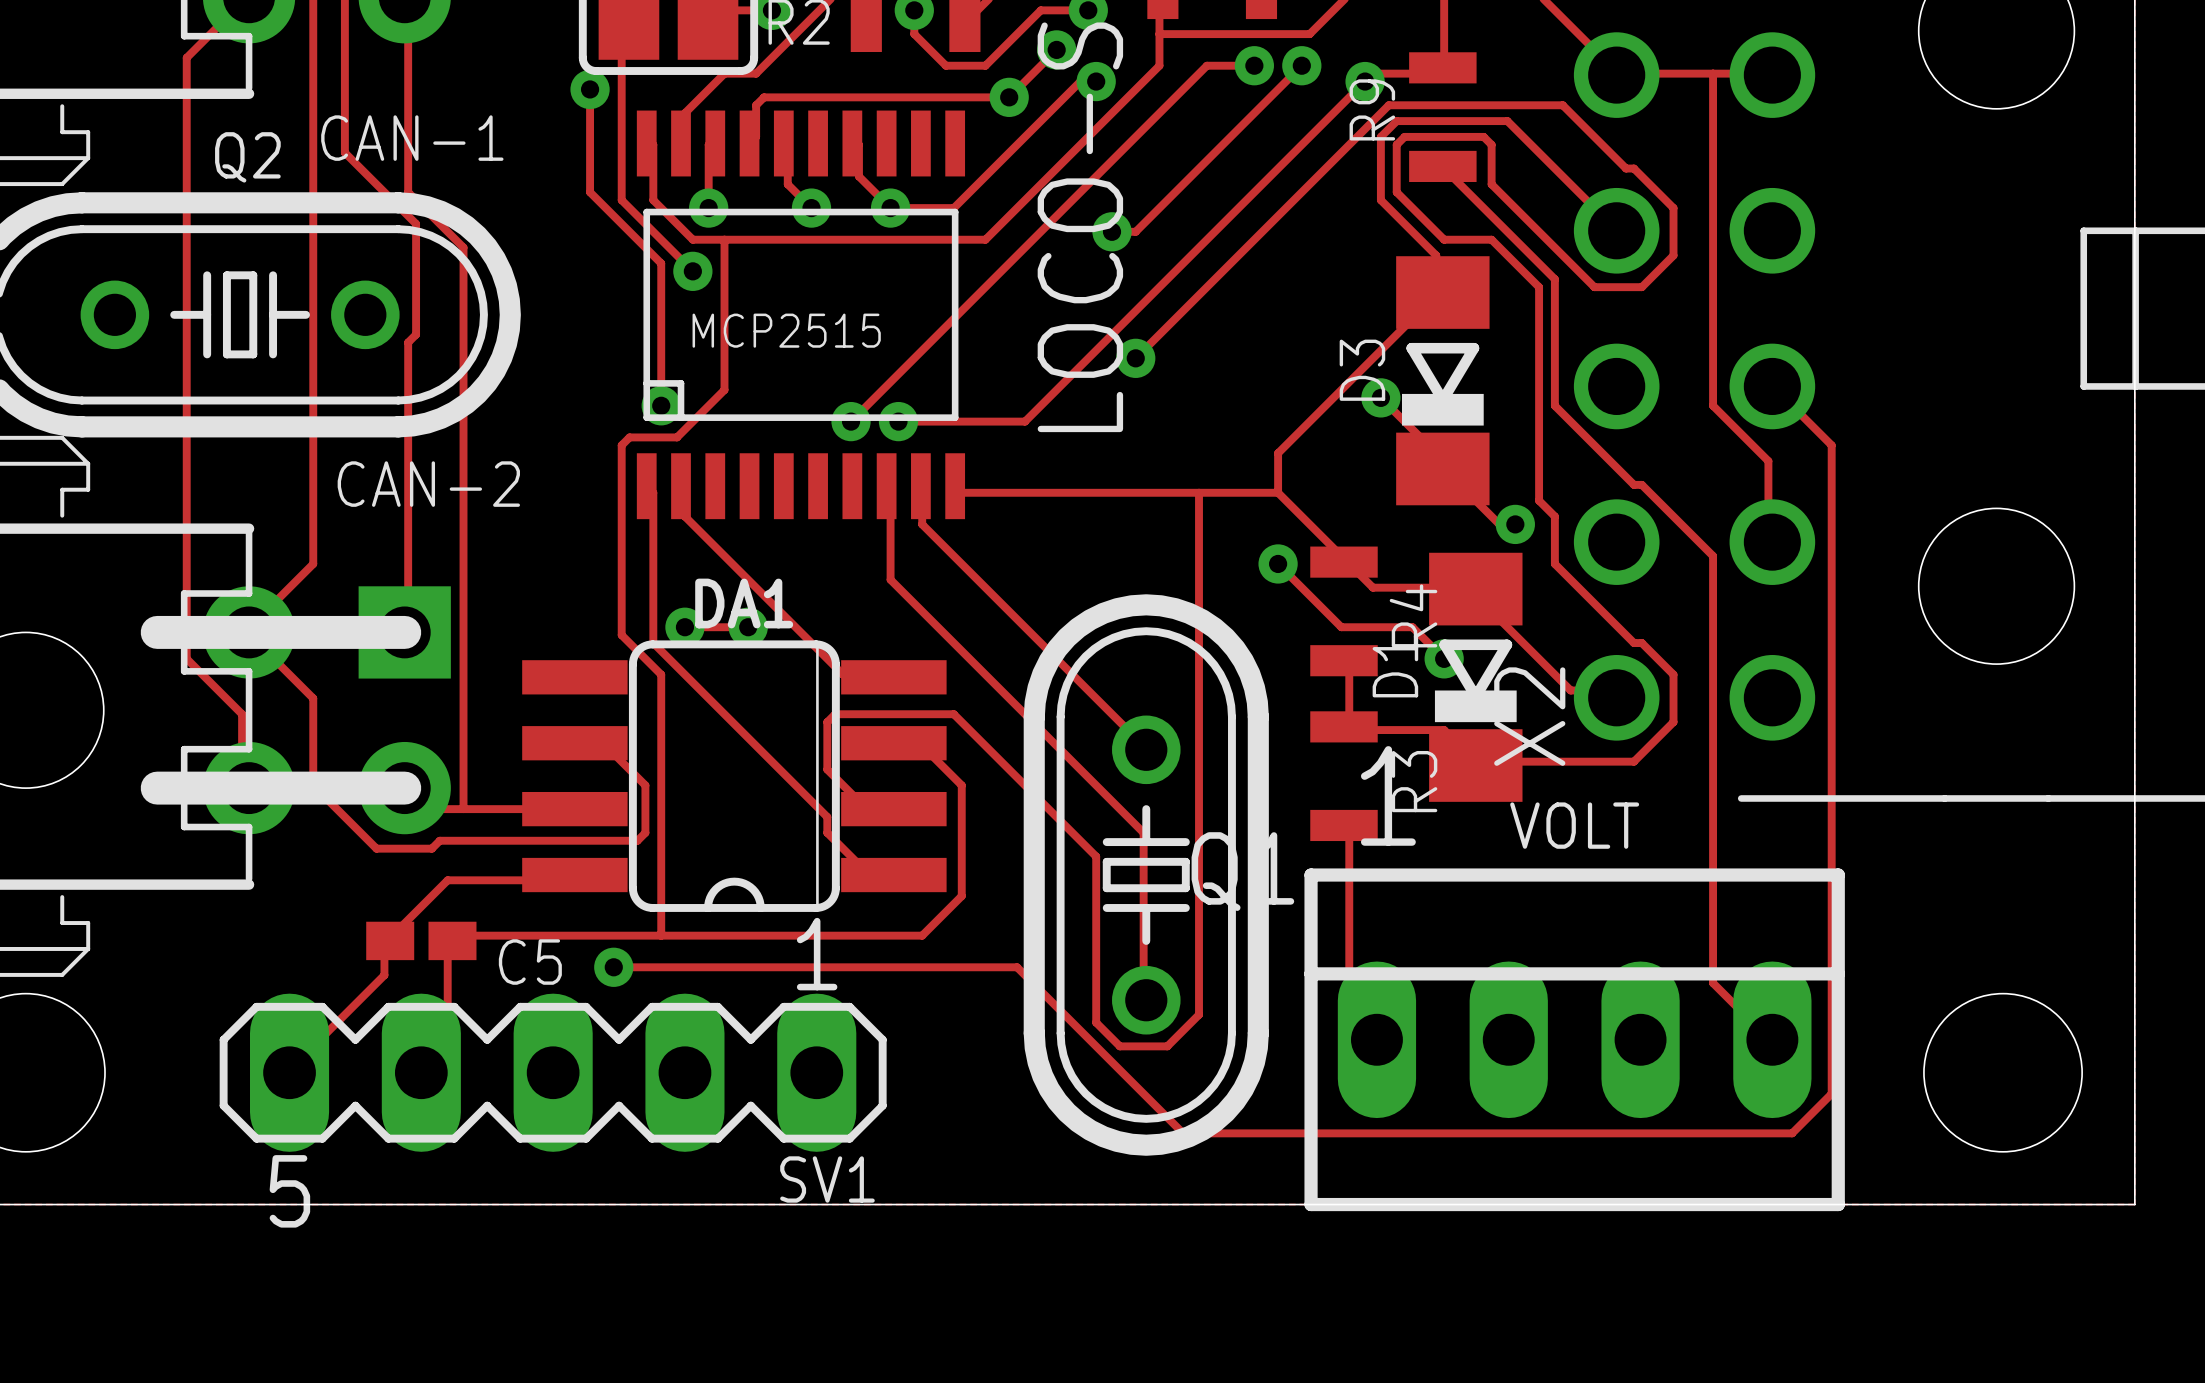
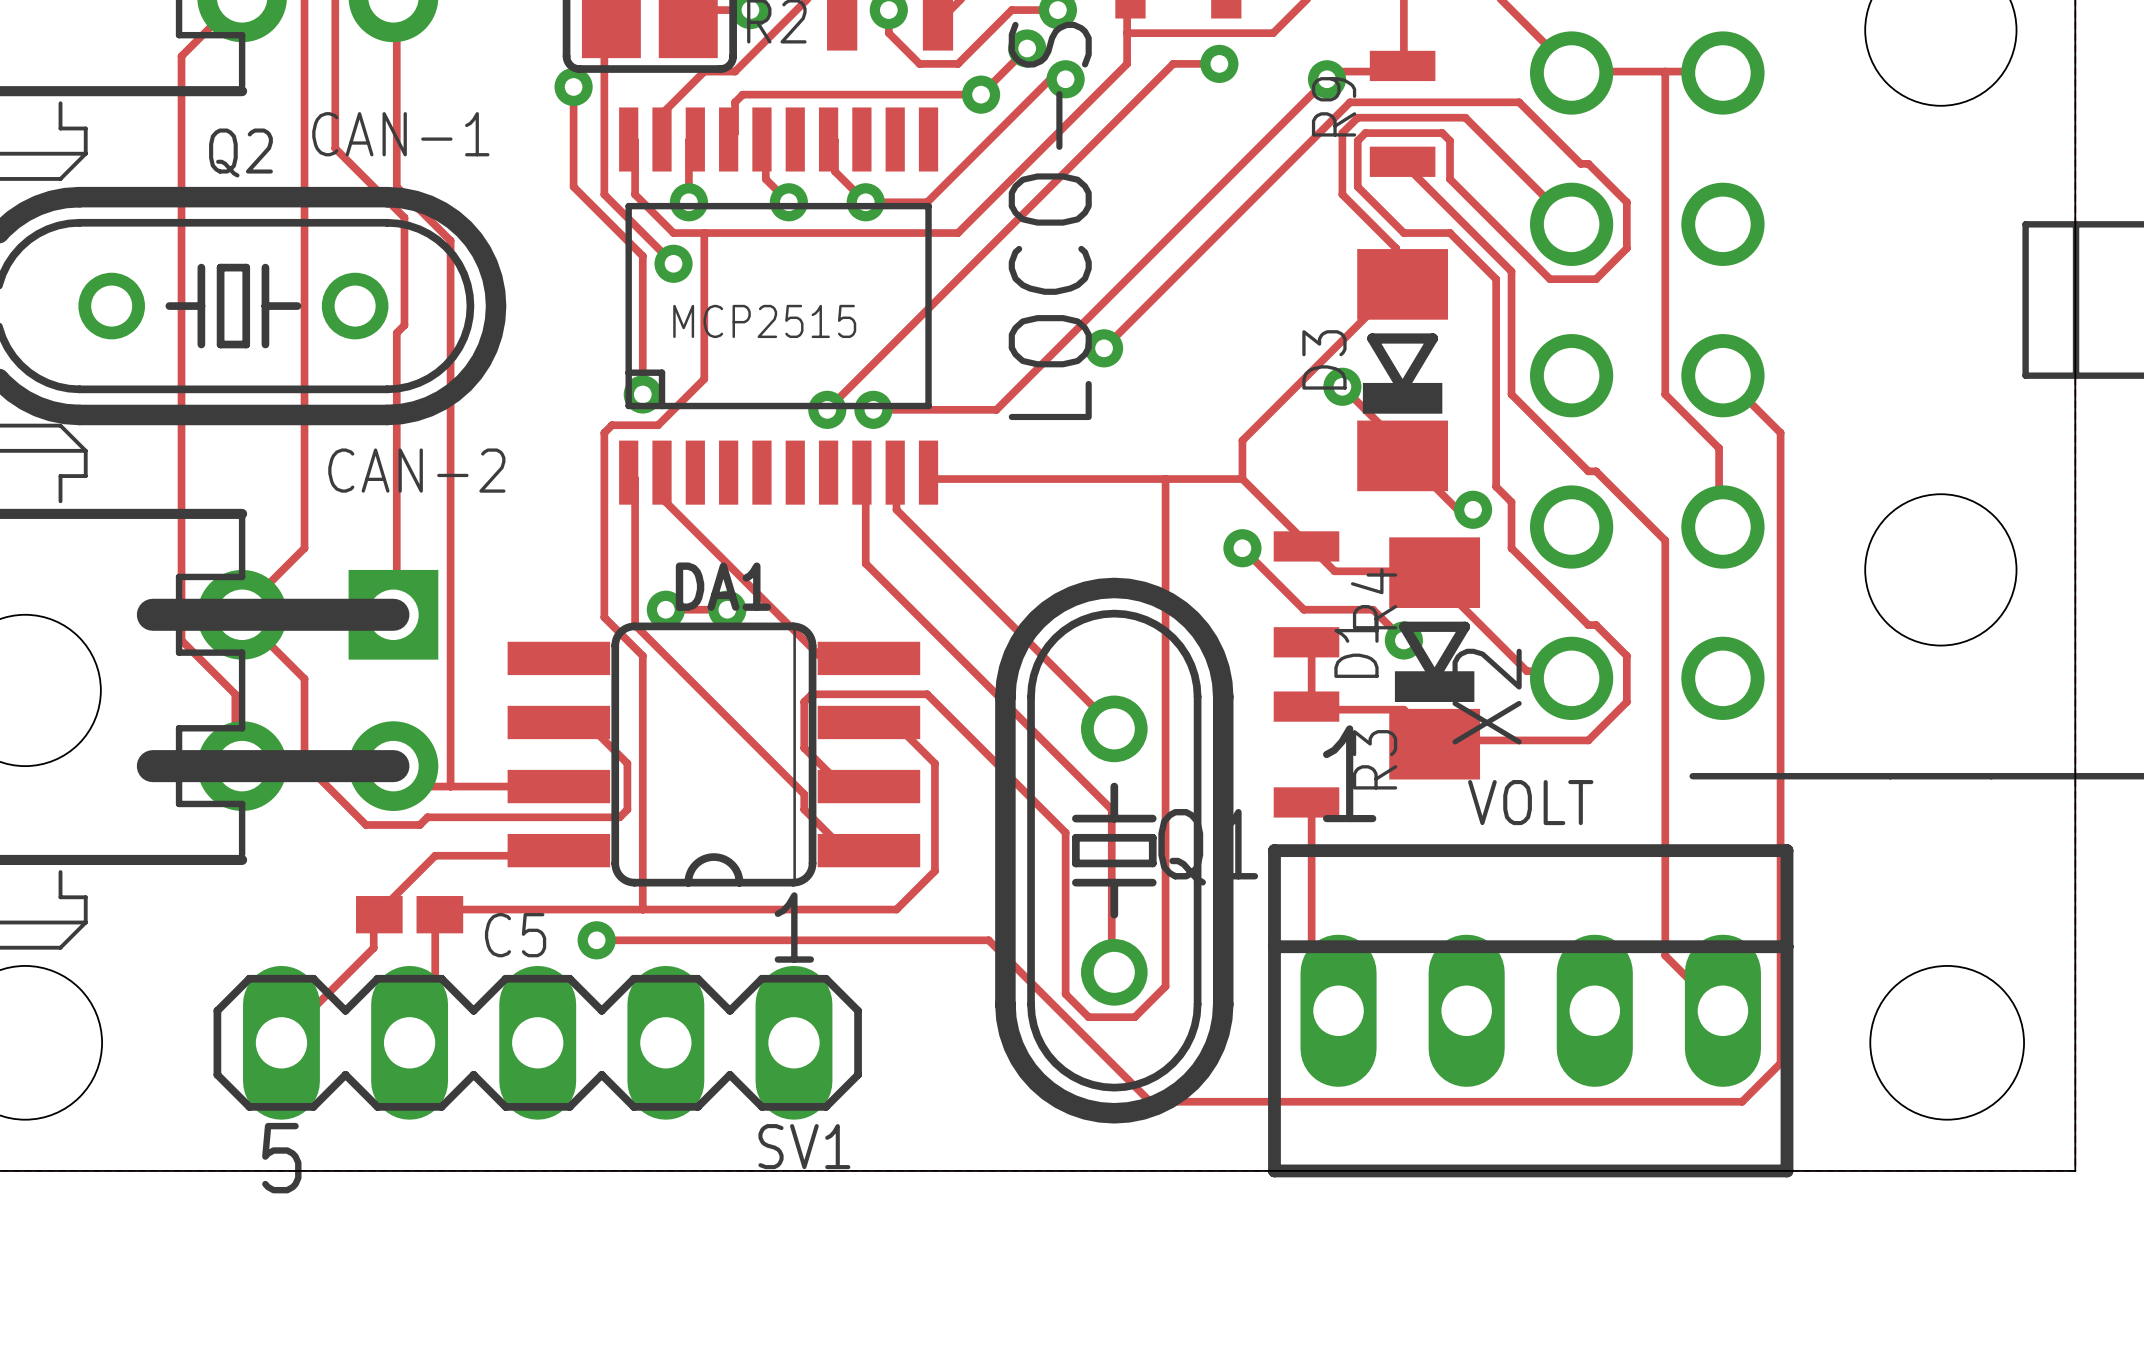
track: (1301, 65) (1135, 231) (1112, 231) -> none
via: (1301, 65) -> none
via: (1112, 231) -> none

